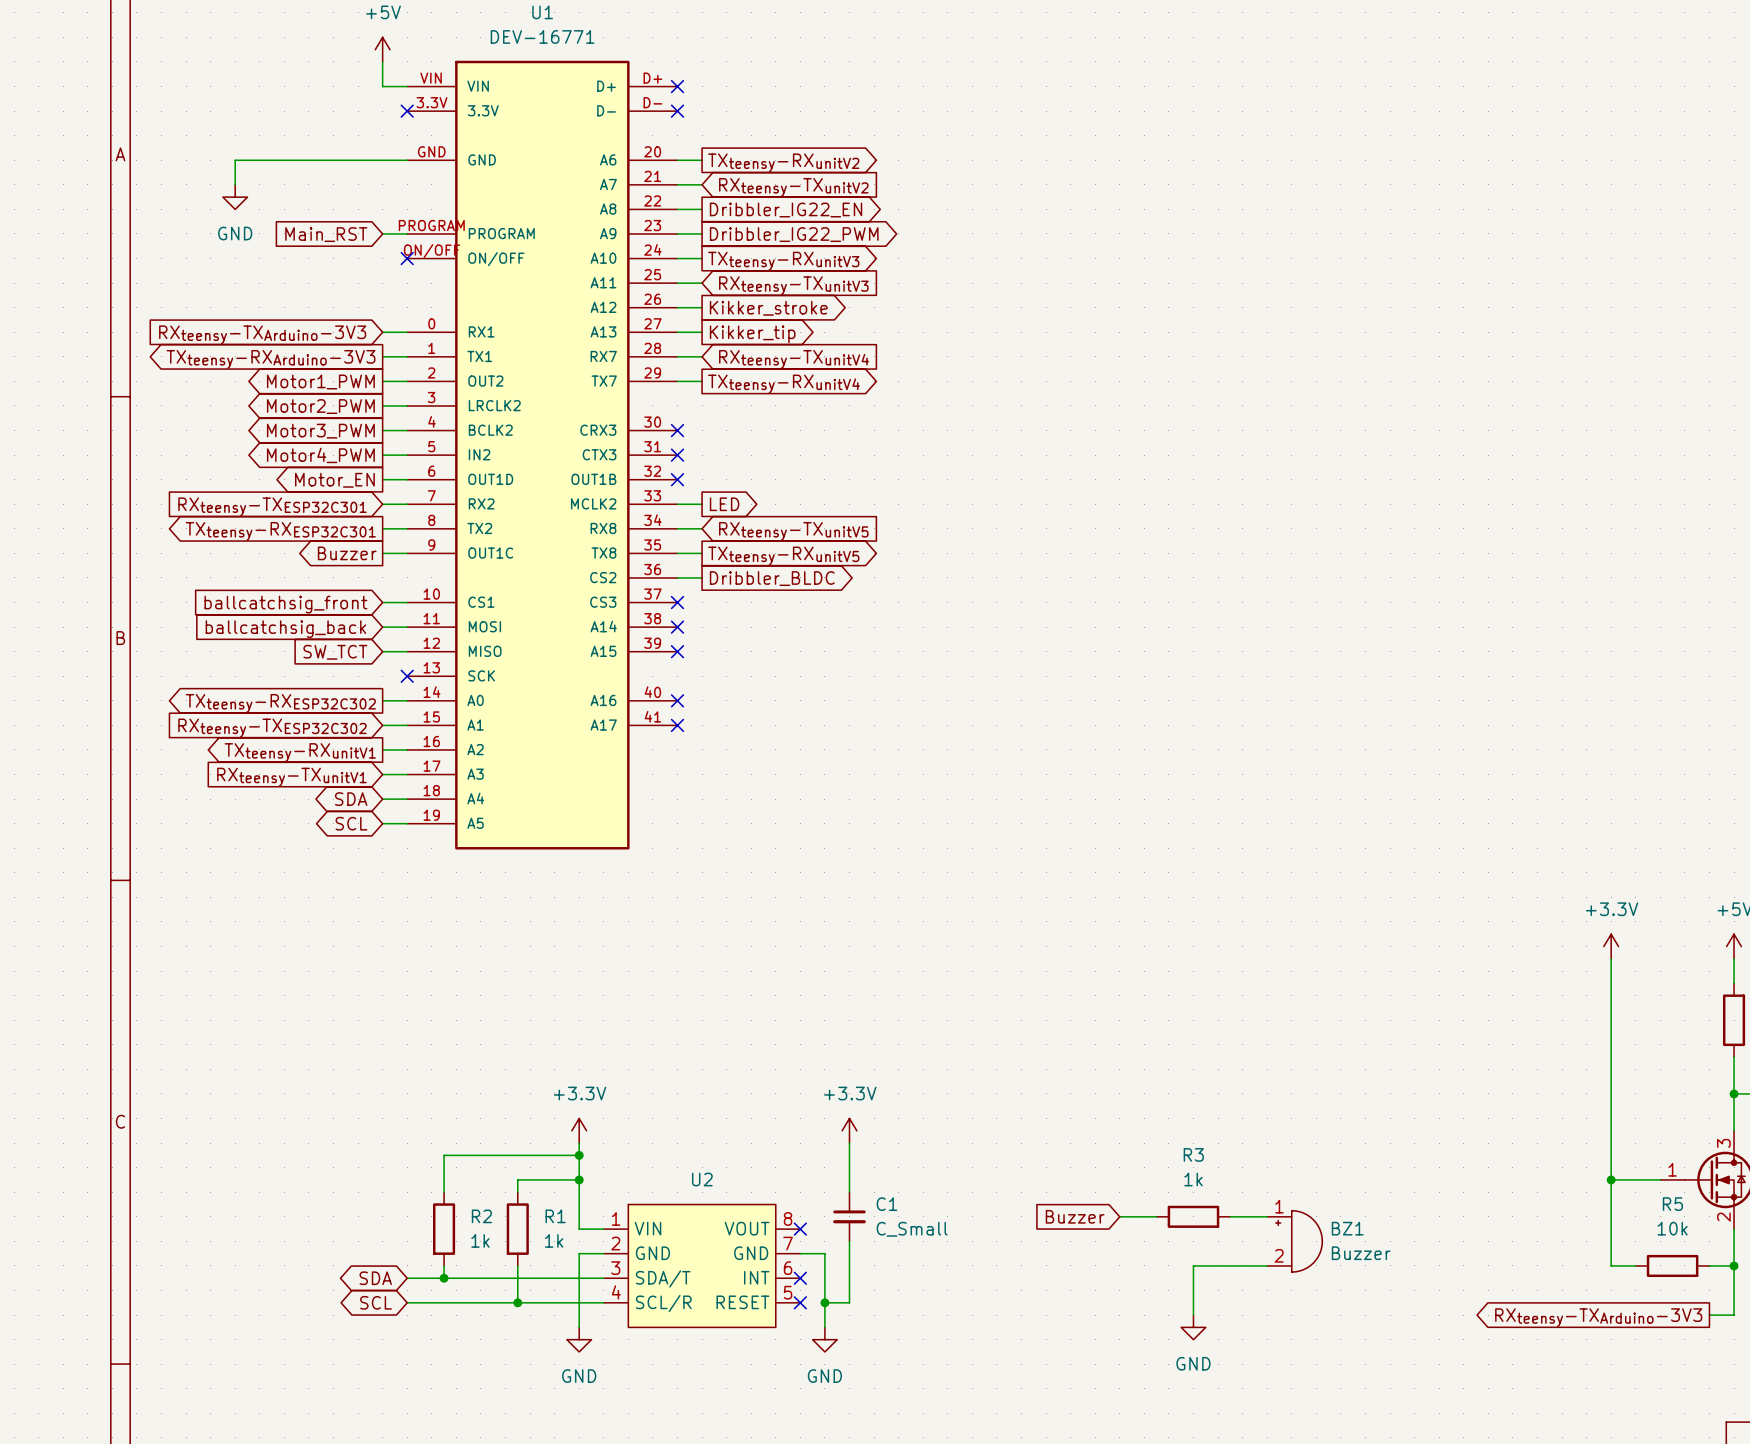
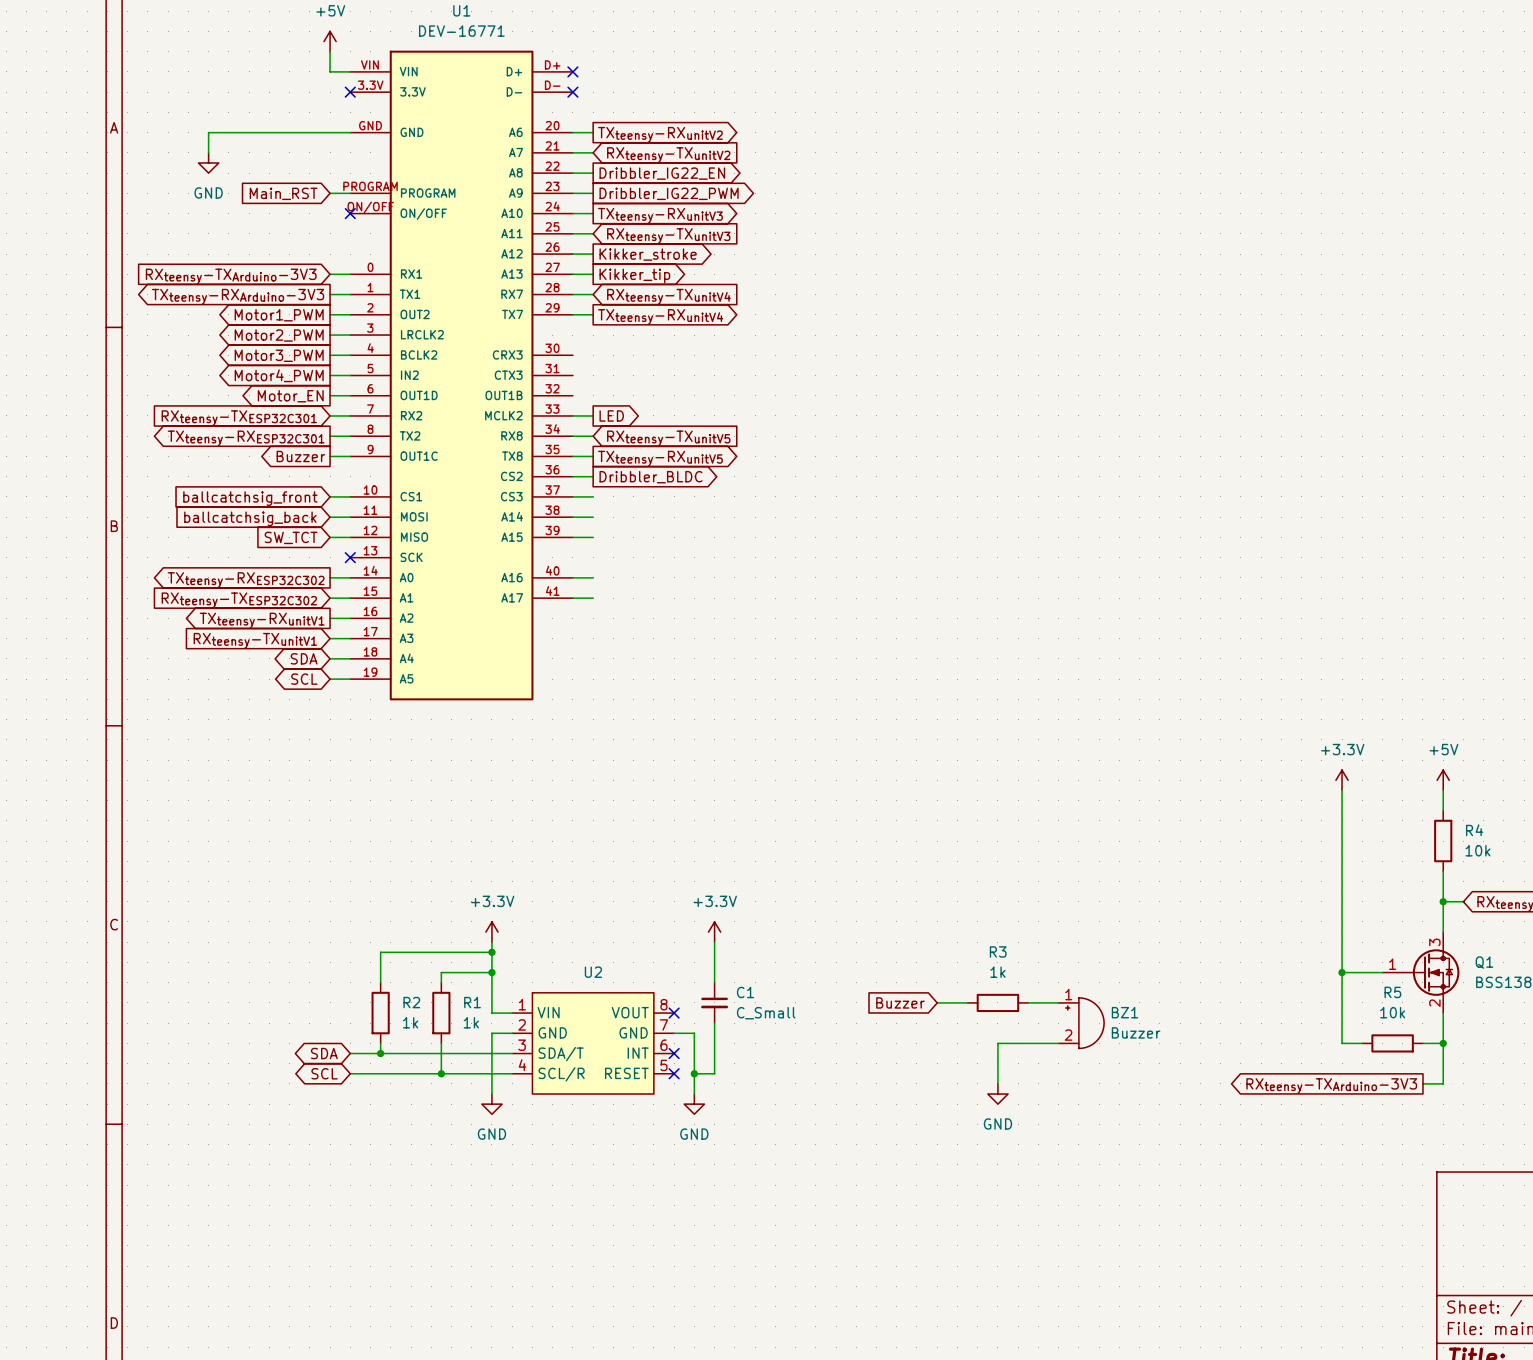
no-connect mark: (677, 430) -> none
no-connect mark: (677, 455) -> none
no-connect mark: (677, 479) -> none
wire: none -> (572, 496) (593, 496)
no-connect mark: (677, 602) -> none
wire: none -> (572, 517) (593, 517)
no-connect mark: (677, 627) -> none
wire: none -> (572, 537) (593, 537)
no-connect mark: (677, 651) -> none
wire: none -> (572, 577) (593, 577)
no-connect mark: (677, 700) -> none
wire: none -> (572, 598) (593, 598)
no-connect mark: (677, 725) -> none

